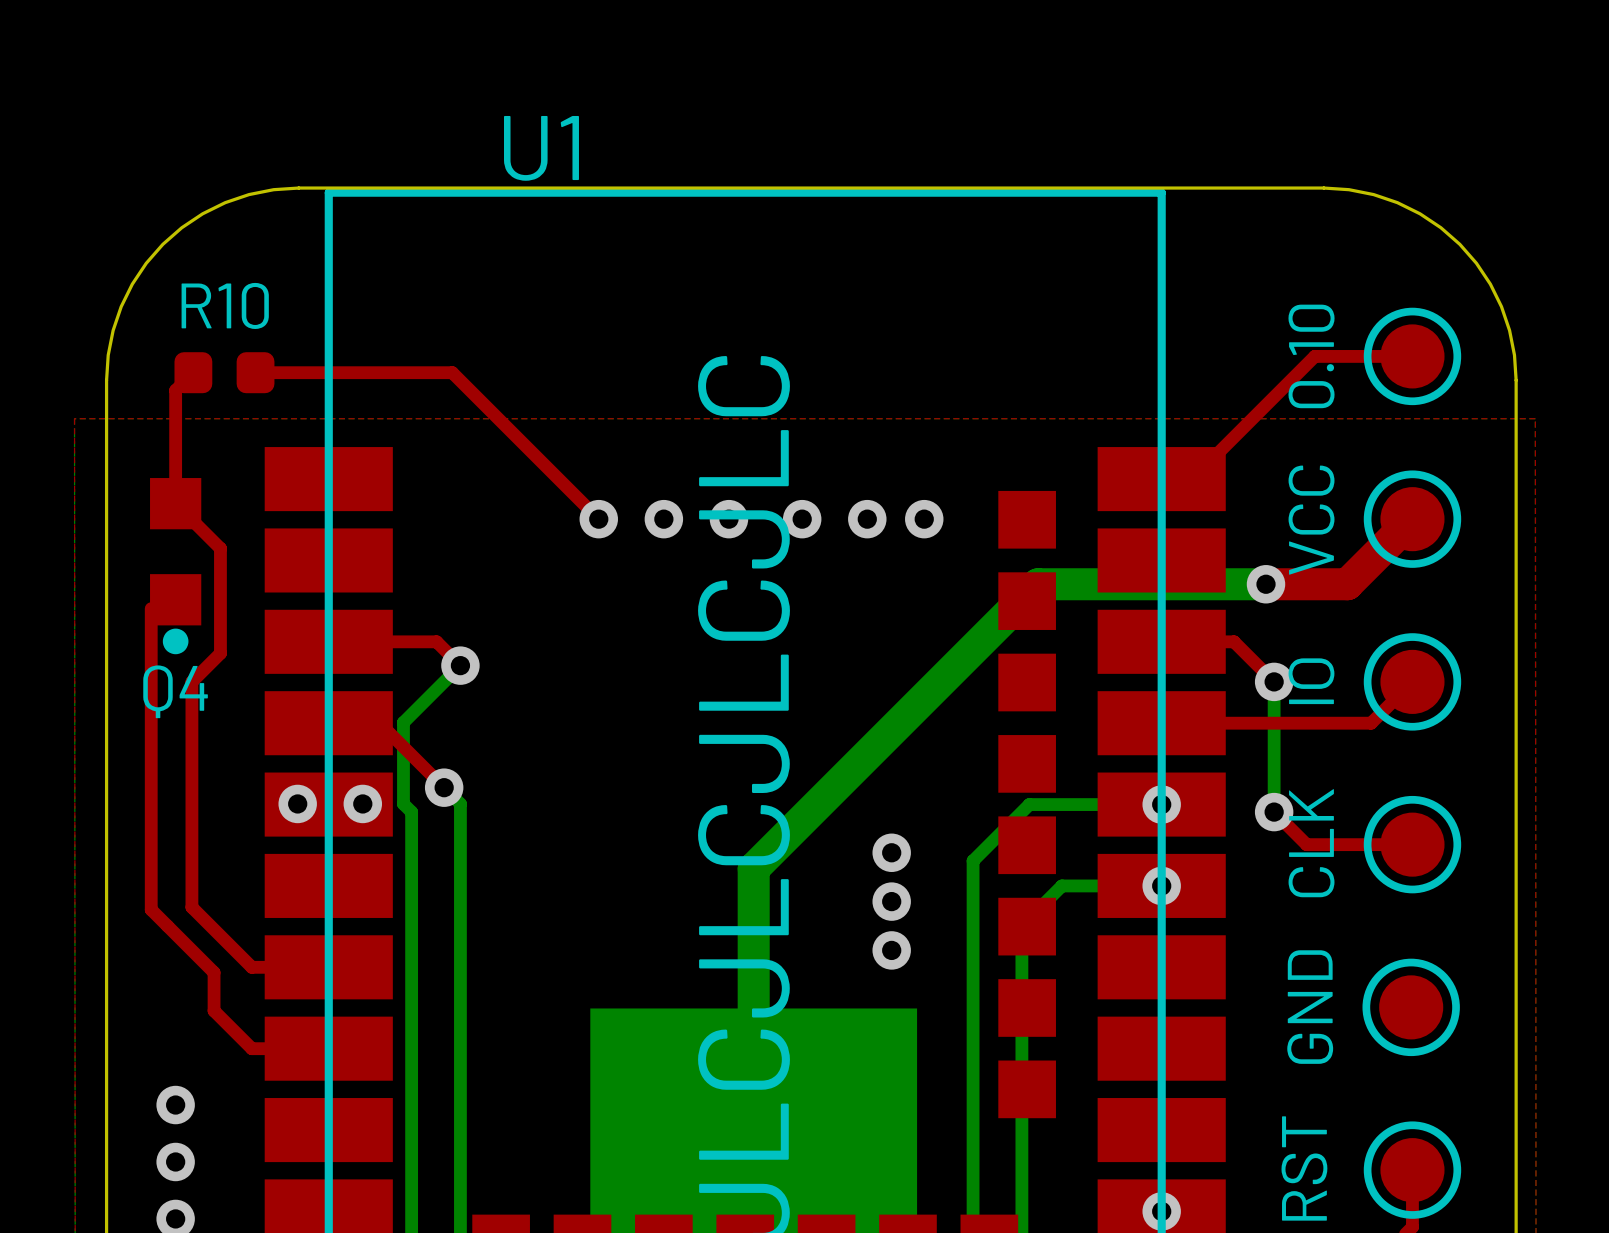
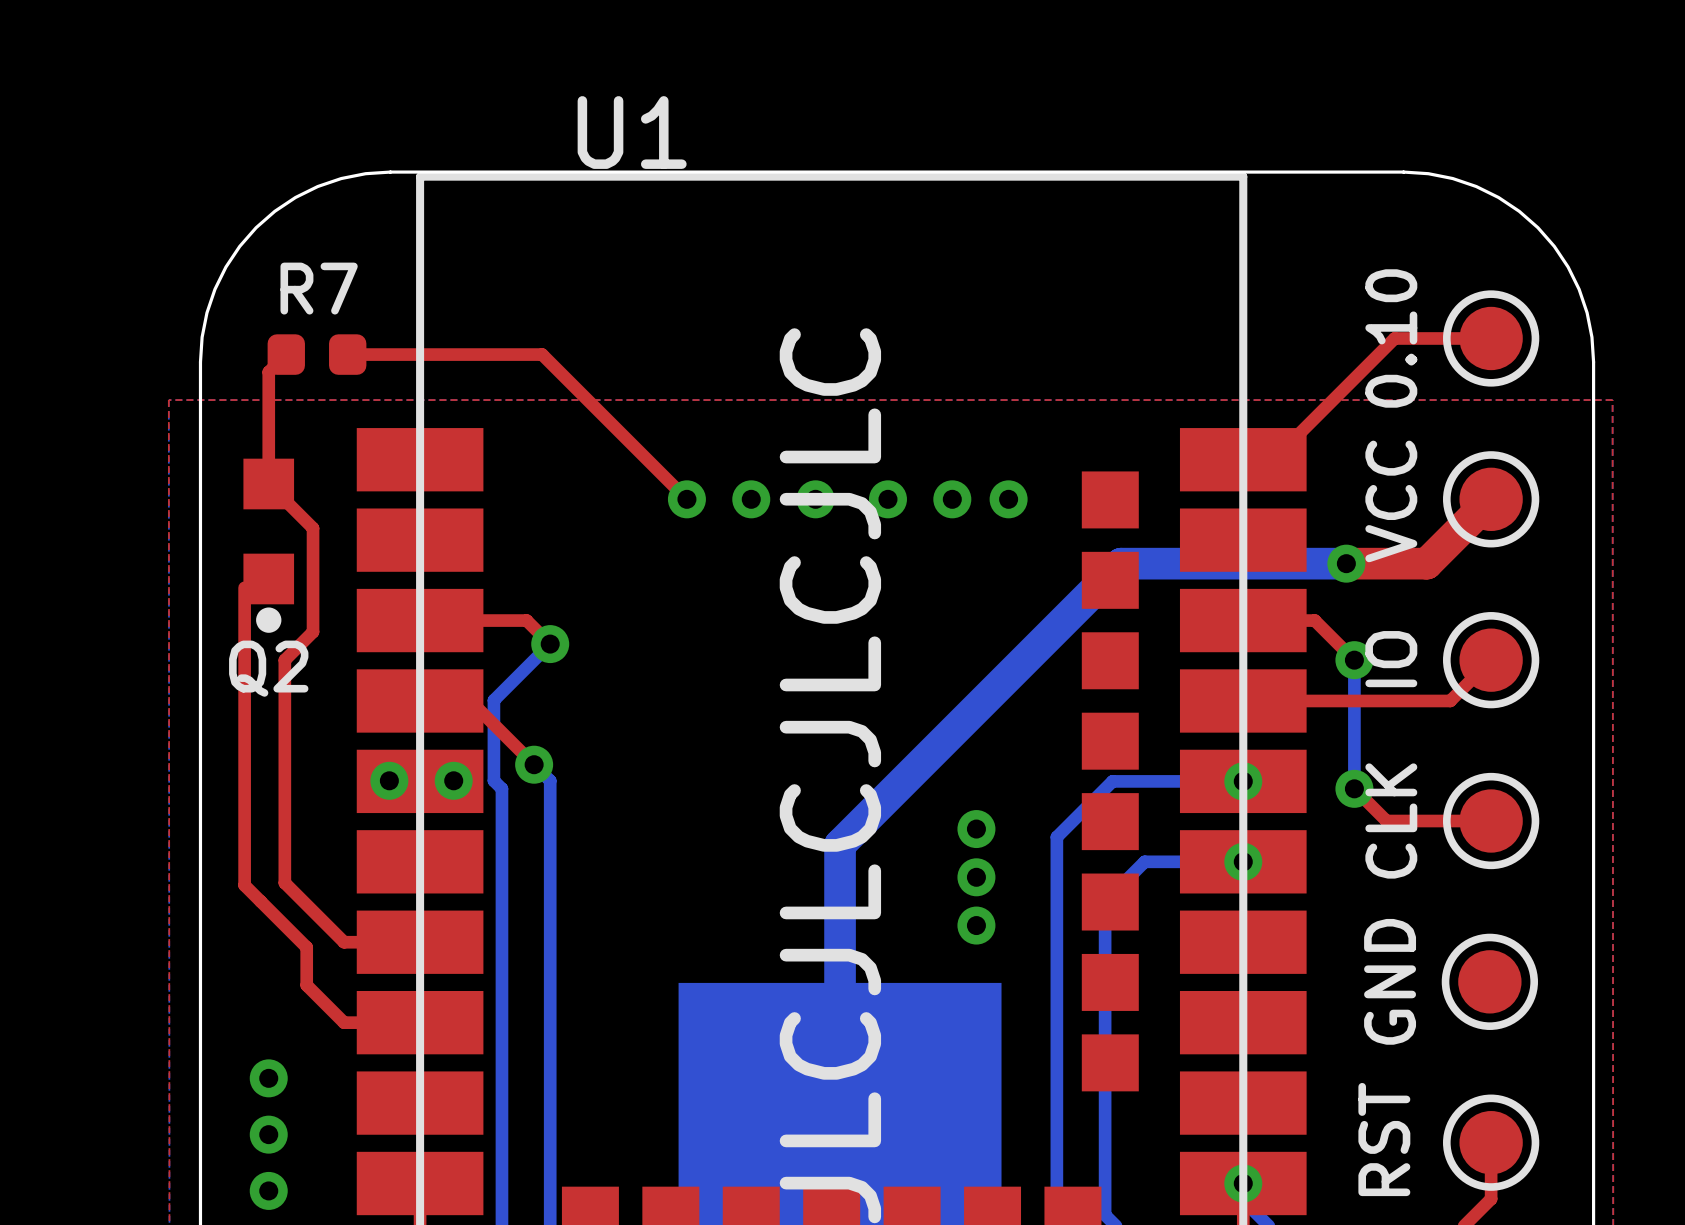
R10 name: R10 (225, 305) -> R7 (319, 288)
Q4 name: Q4 (175, 691) -> Q2 (268, 668)

